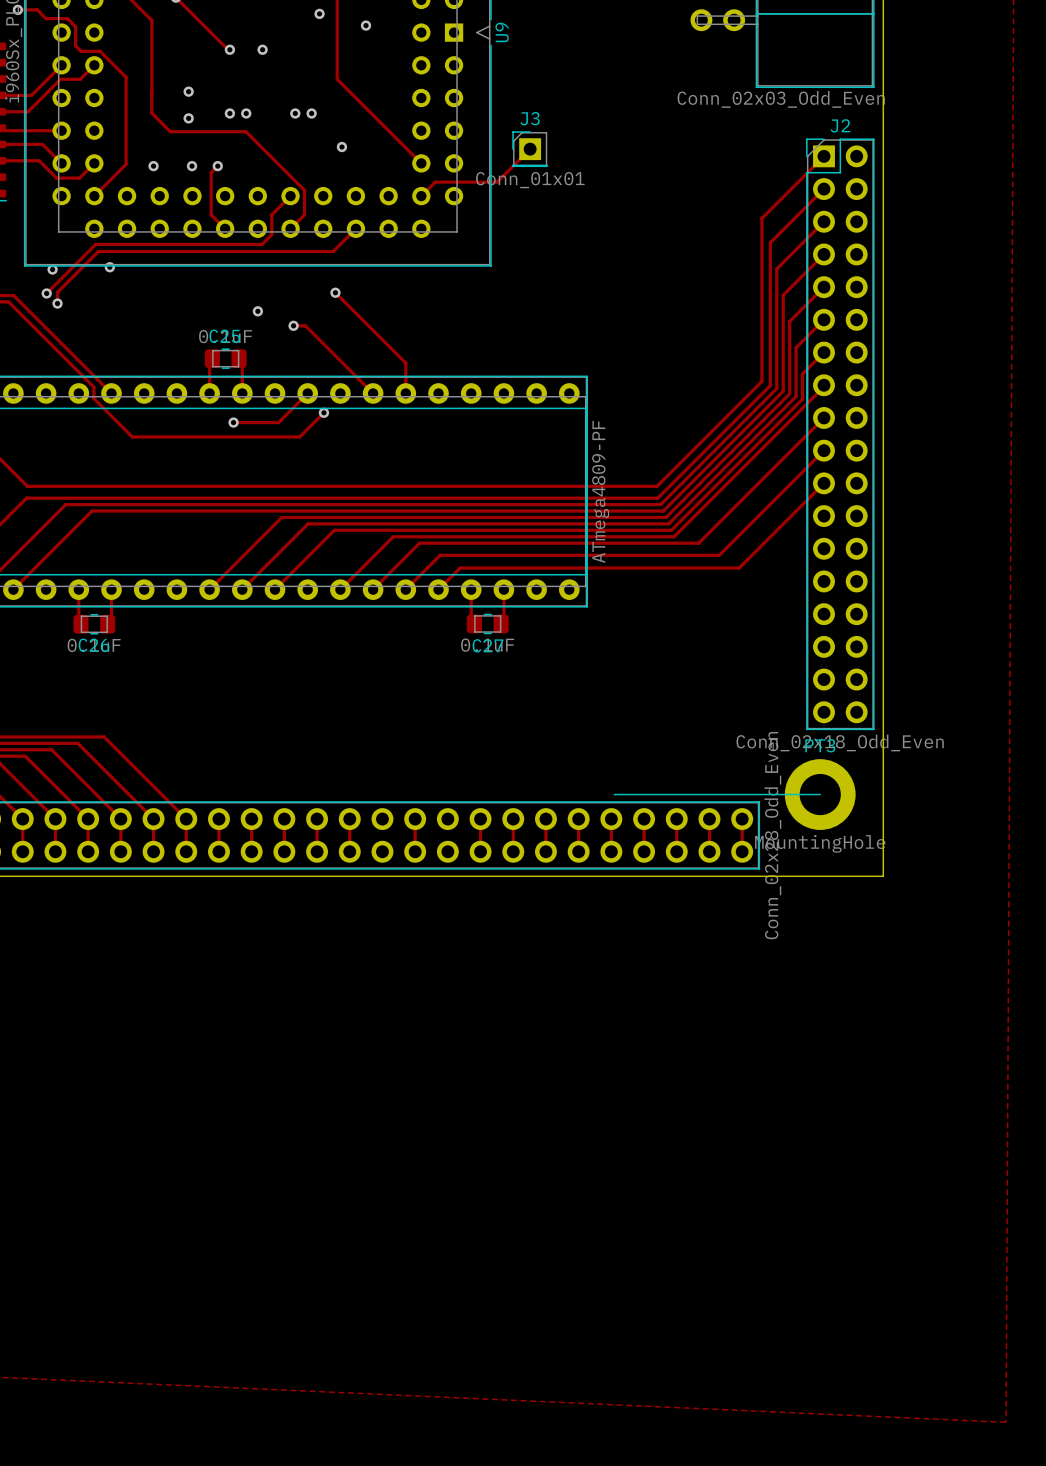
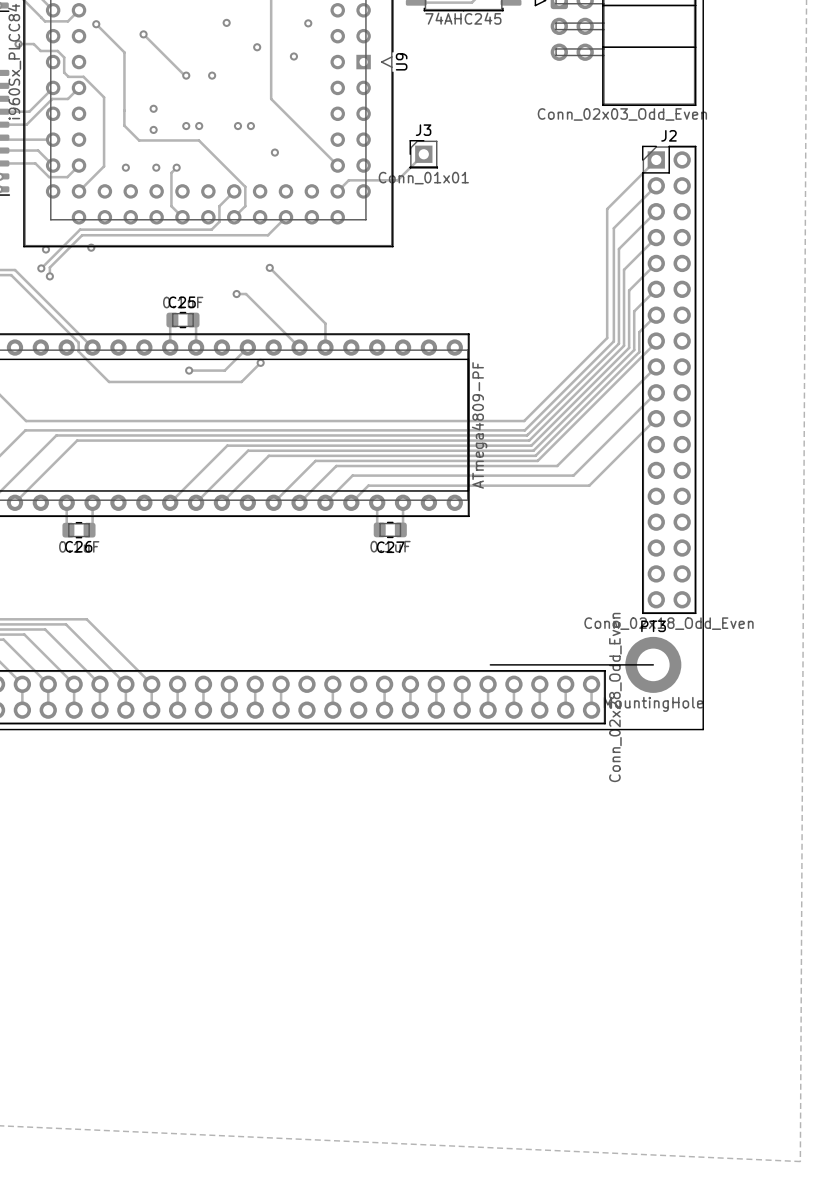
via: (257, 311) -> none

